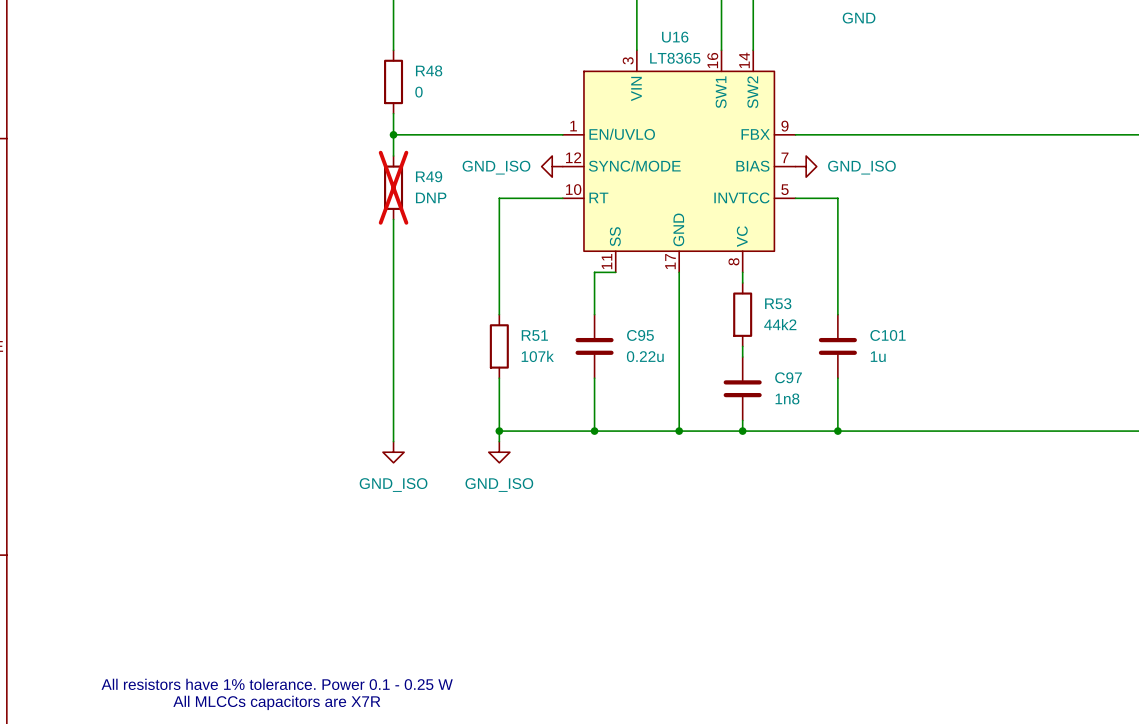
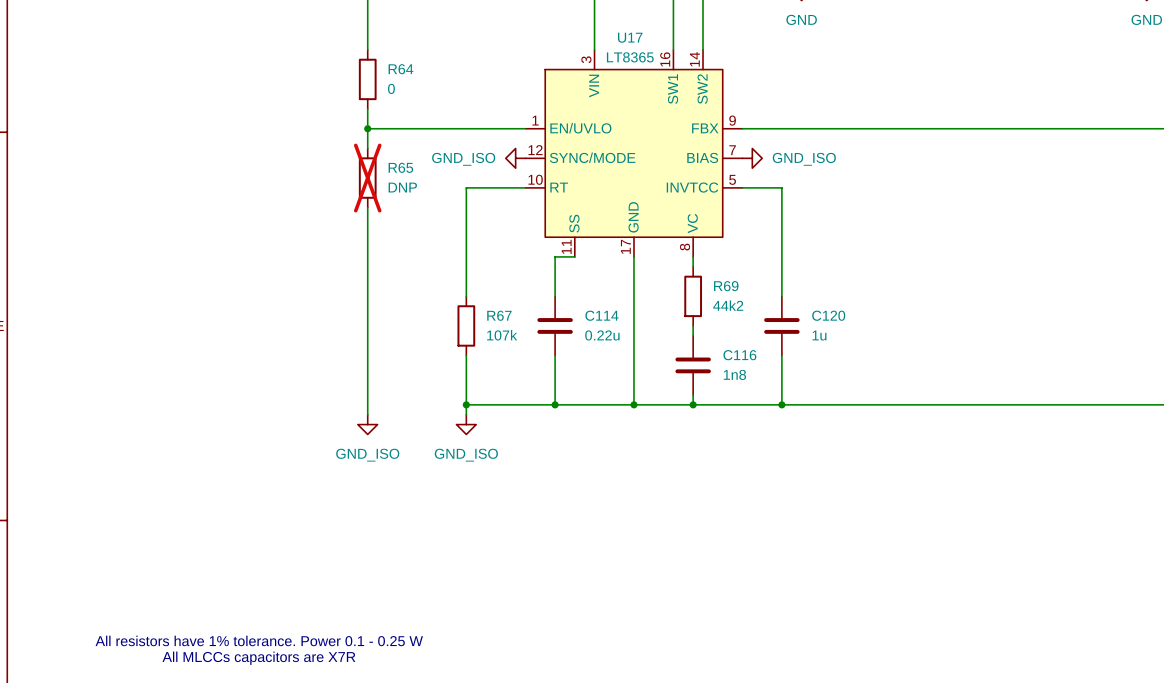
U16 name: U16 (675, 37) -> U17 (630, 37)
R48 name: R48 (429, 70) -> R64 (400, 69)
R49 name: R49 (429, 176) -> R65 (400, 167)
R53 name: R53 (778, 303) -> R69 (726, 286)
R51 name: R51 (534, 335) -> R67 (499, 315)
C95 name: C95 (640, 335) -> C114 (601, 315)
C101 name: C101 (888, 335) -> C120 (828, 315)
C97 name: C97 (788, 377) -> C116 (739, 355)

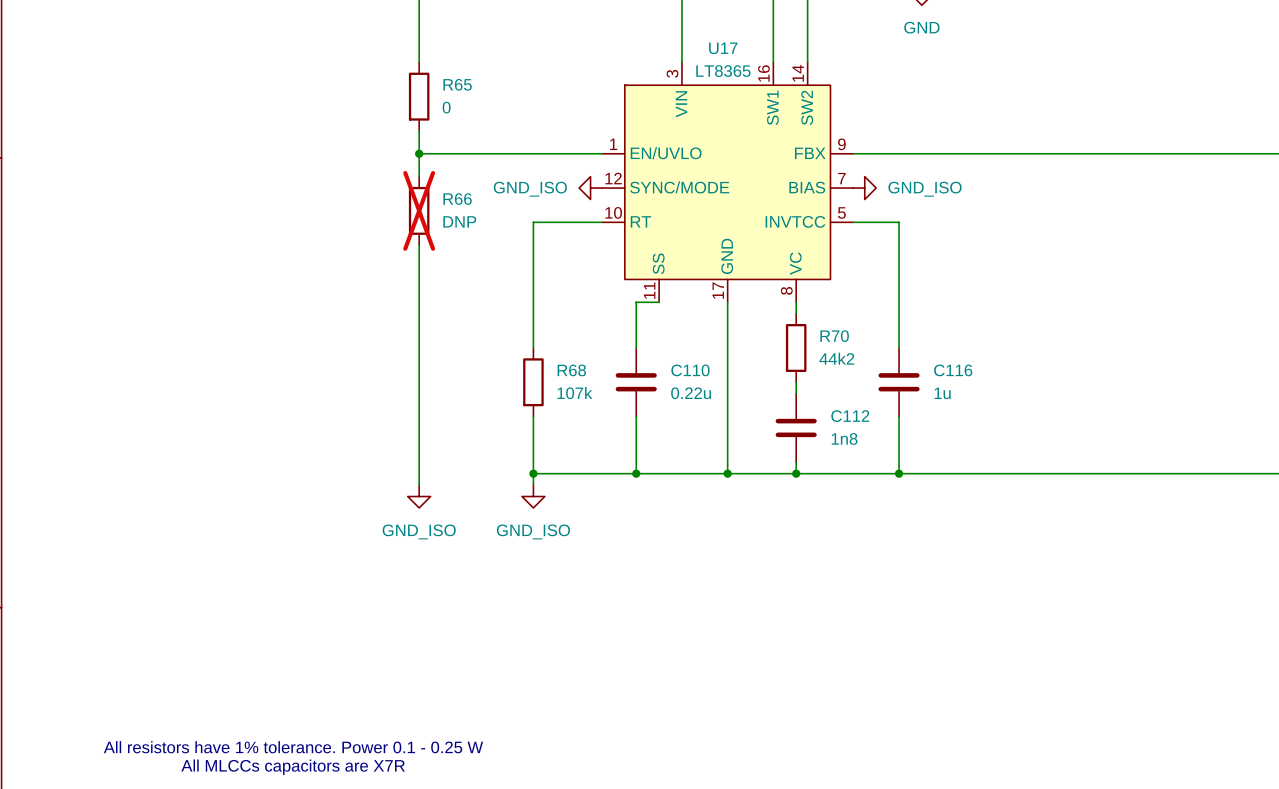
R64 name: R64 (400, 69) -> R65 (457, 84)
R65 name: R65 (400, 167) -> R66 (457, 199)
R69 name: R69 (726, 286) -> R70 (834, 336)
R67 name: R67 (499, 315) -> R68 (571, 370)
C114 name: C114 (601, 315) -> C110 (690, 370)
C120 name: C120 (828, 315) -> C116 (953, 370)
C116 name: C116 (739, 355) -> C112 (850, 416)

